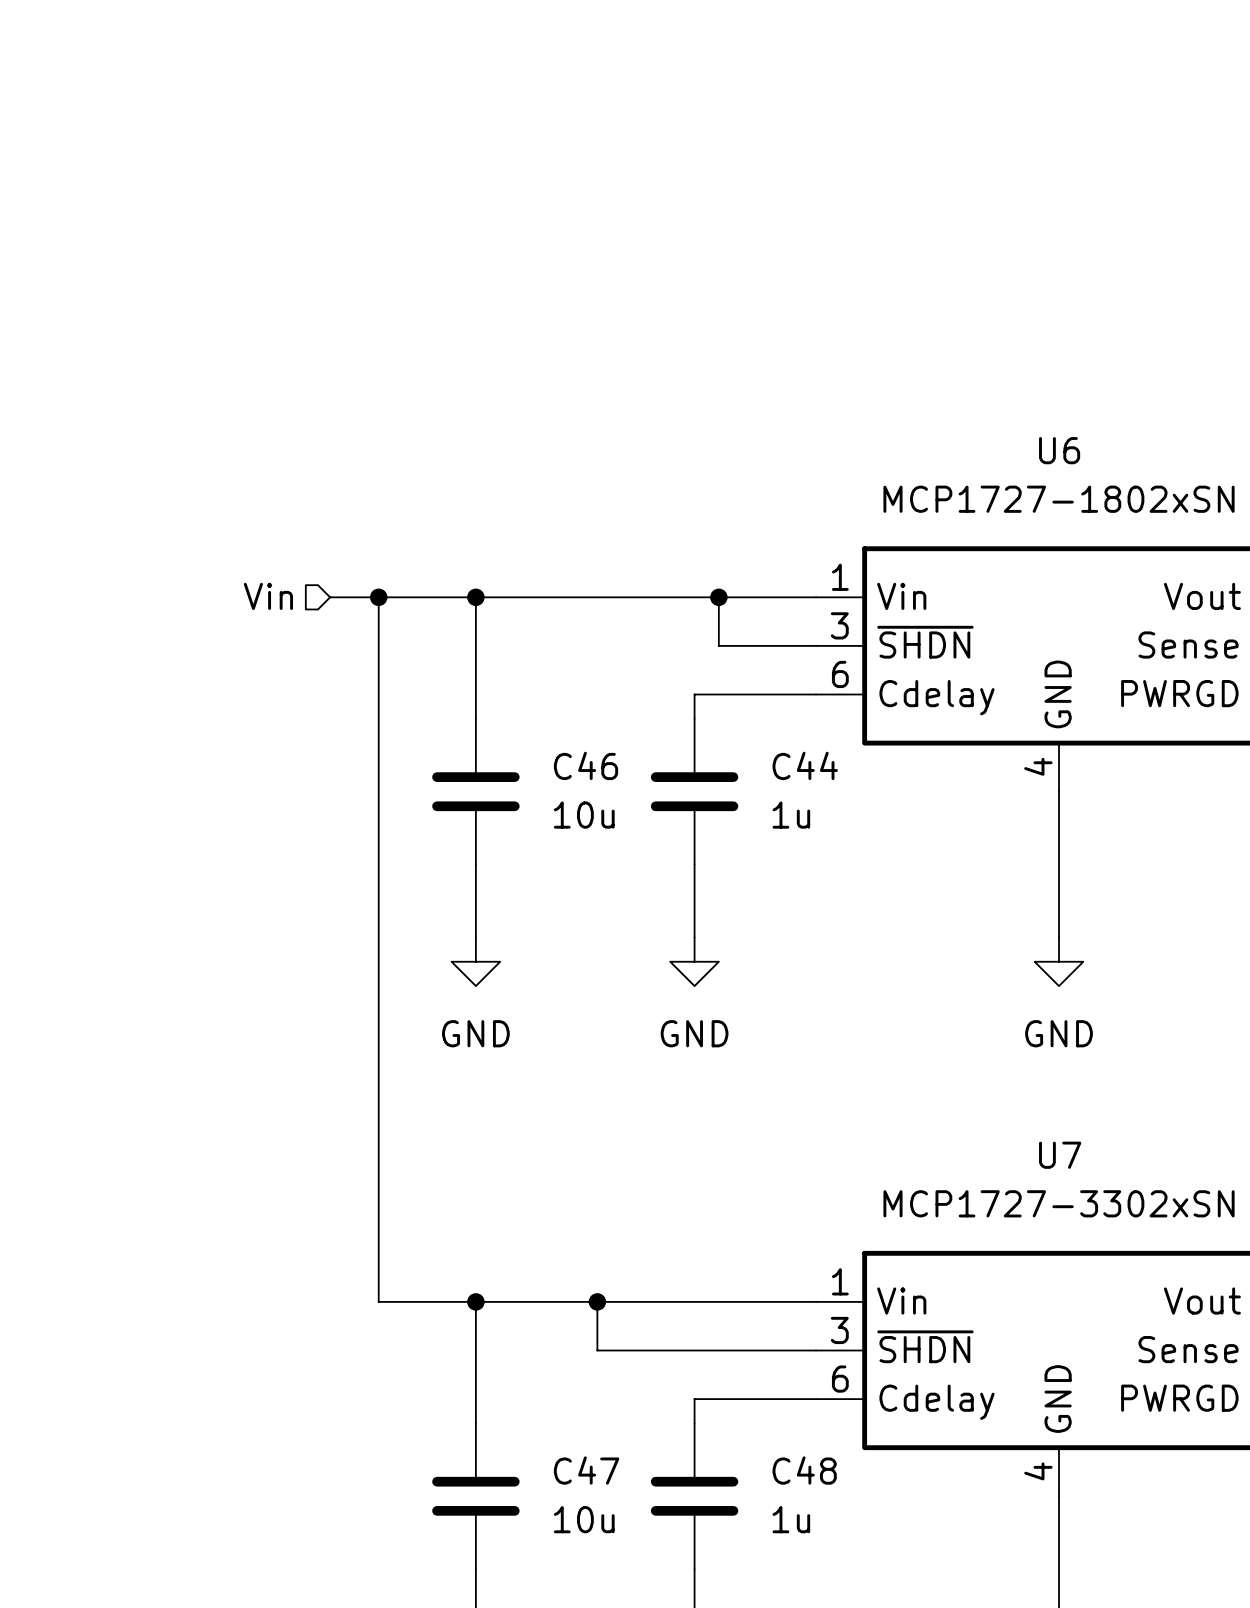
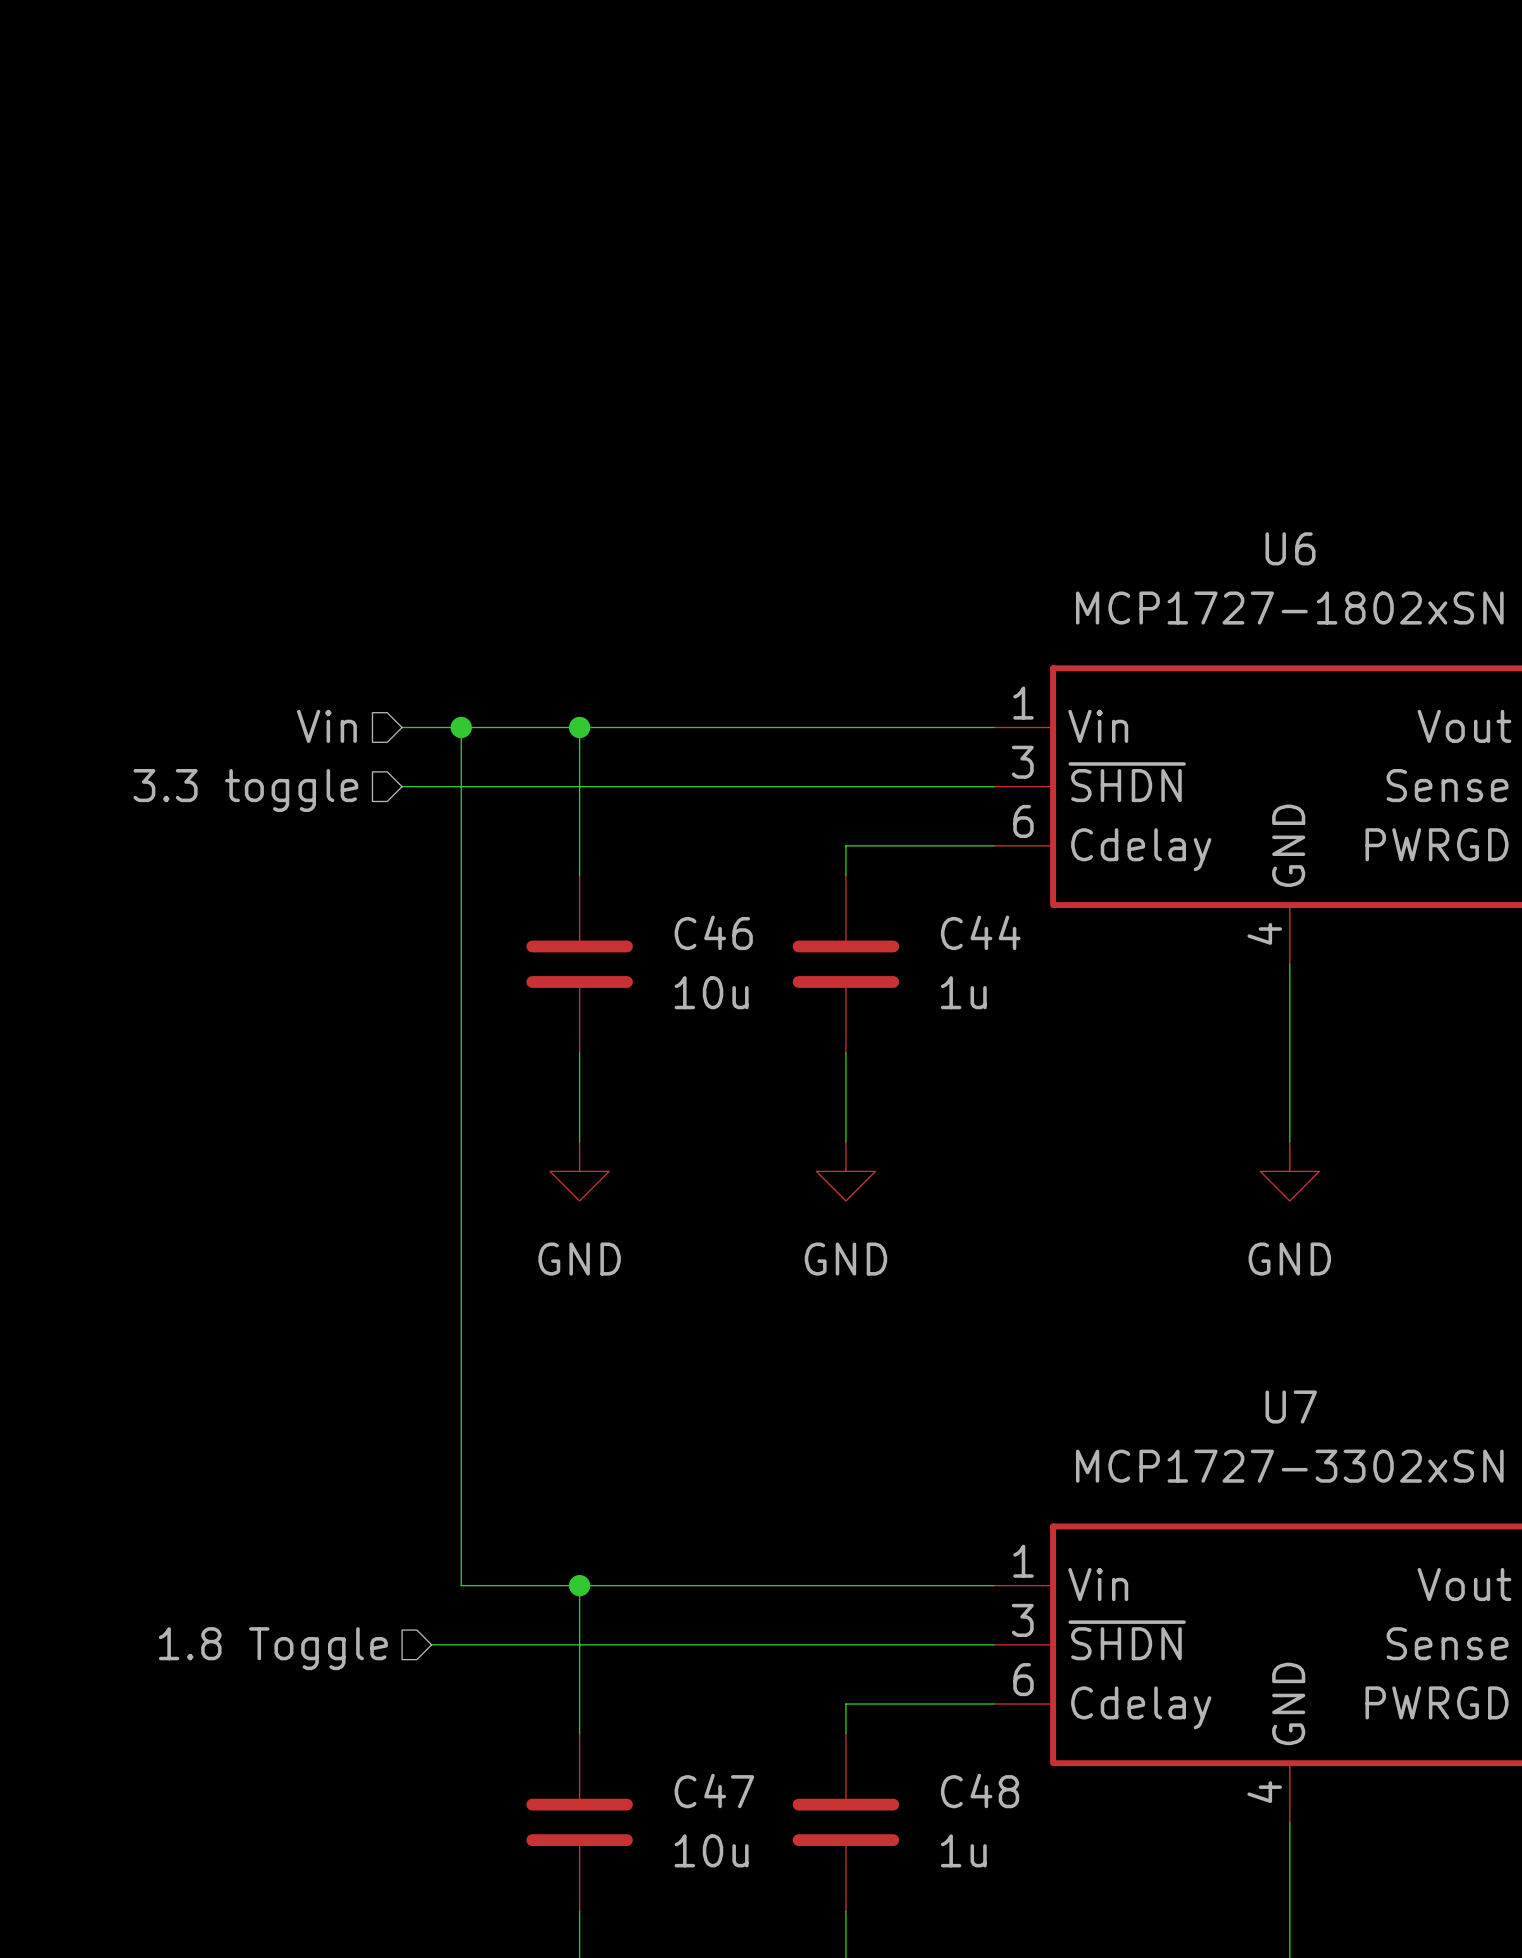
wire: (718, 597) (718, 645) -> (402, 786) (875, 786)
junction: (718, 597) -> none
hierarchical label: none -> 3.3 toggle (245, 790)
wire: (597, 1301) (597, 1350) -> (431, 1644) (727, 1644)
junction: (597, 1301) -> none
hierarchical label: none -> 1.8 Toggle (273, 1648)

